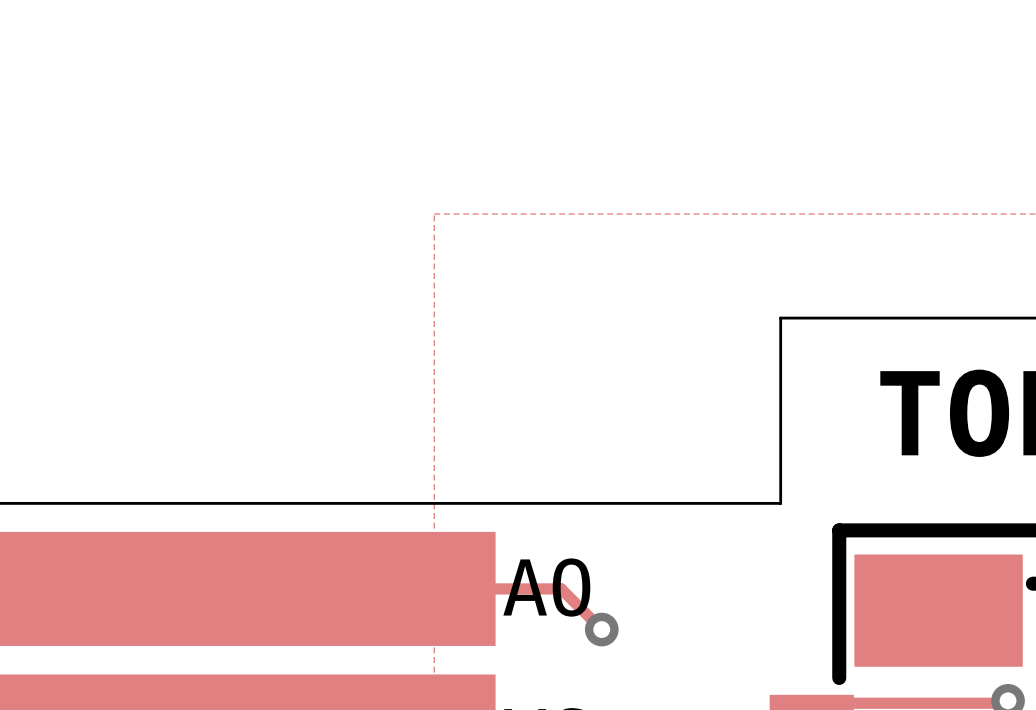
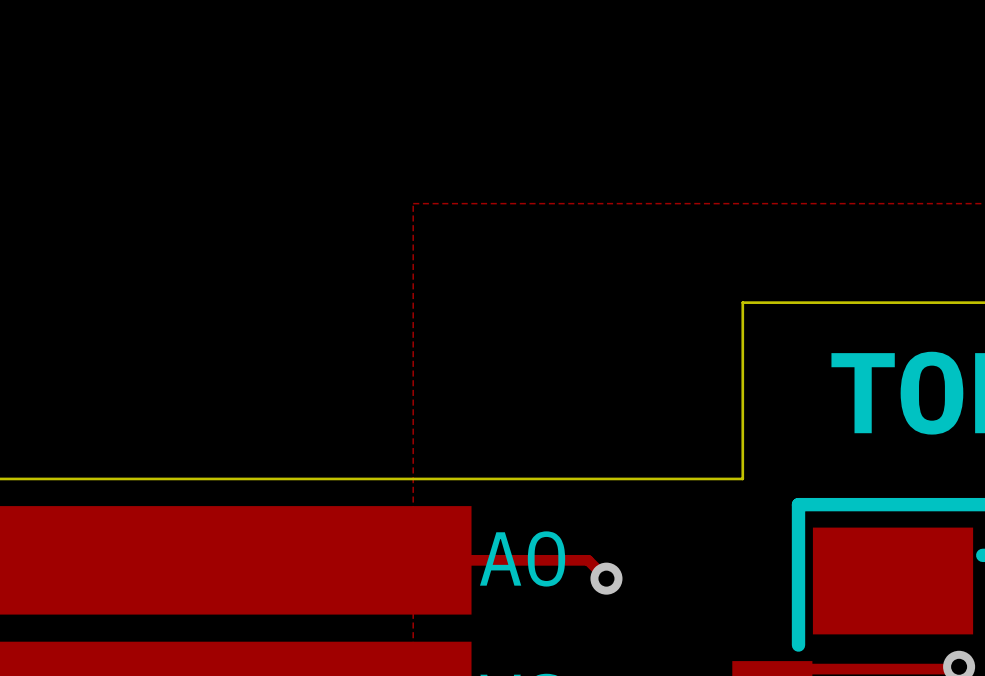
track: (561, 588) (601, 629) -> (533, 560) (588, 560) (606, 578)
via position: (601, 629) -> (606, 578)

